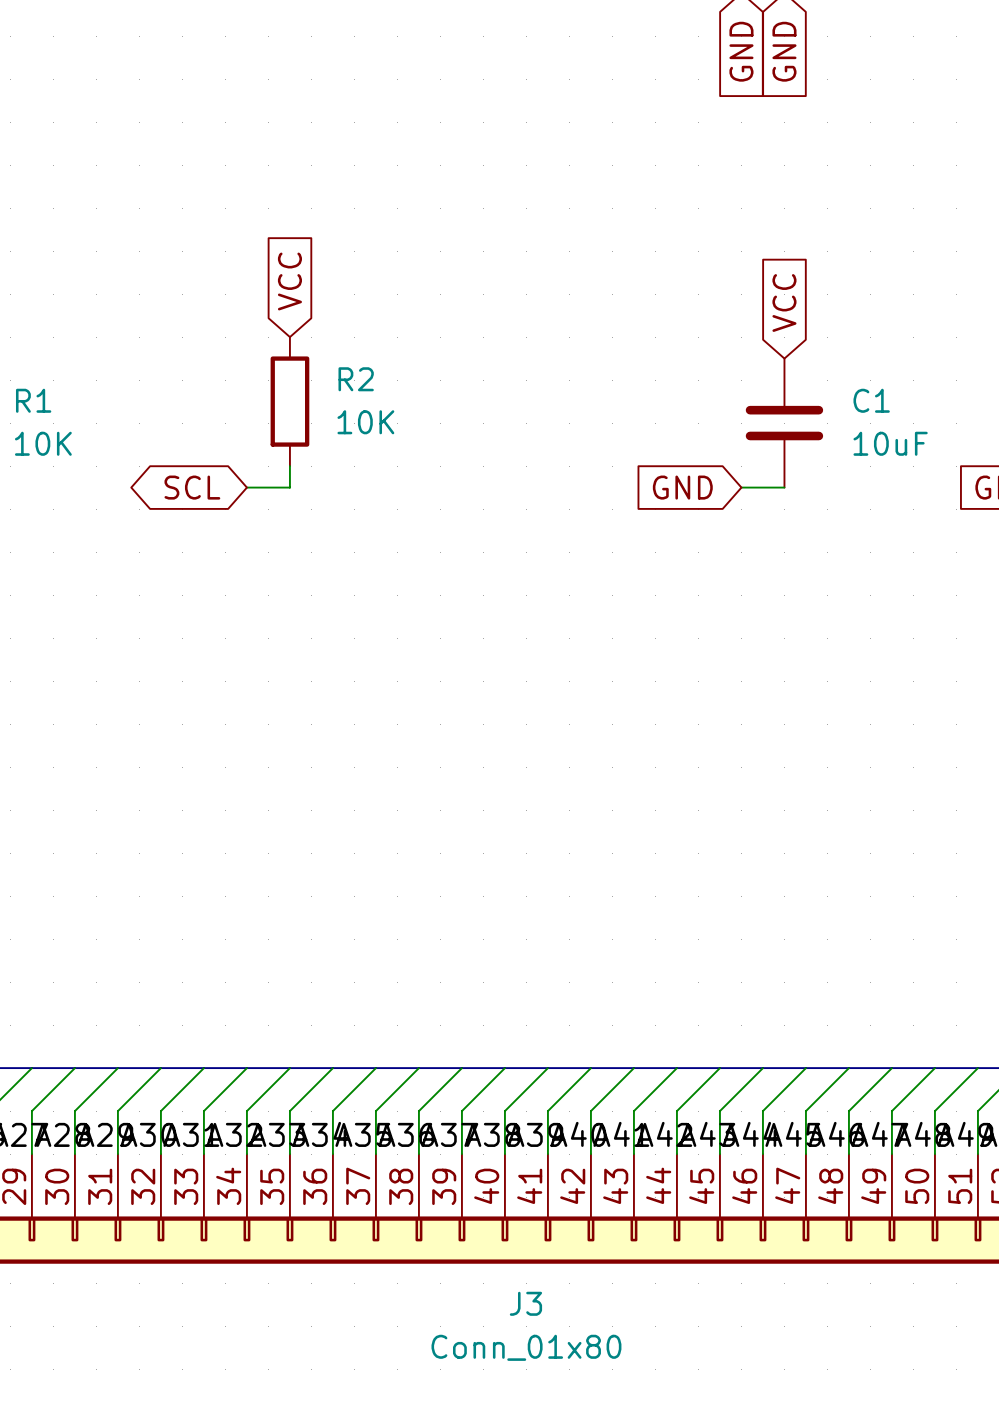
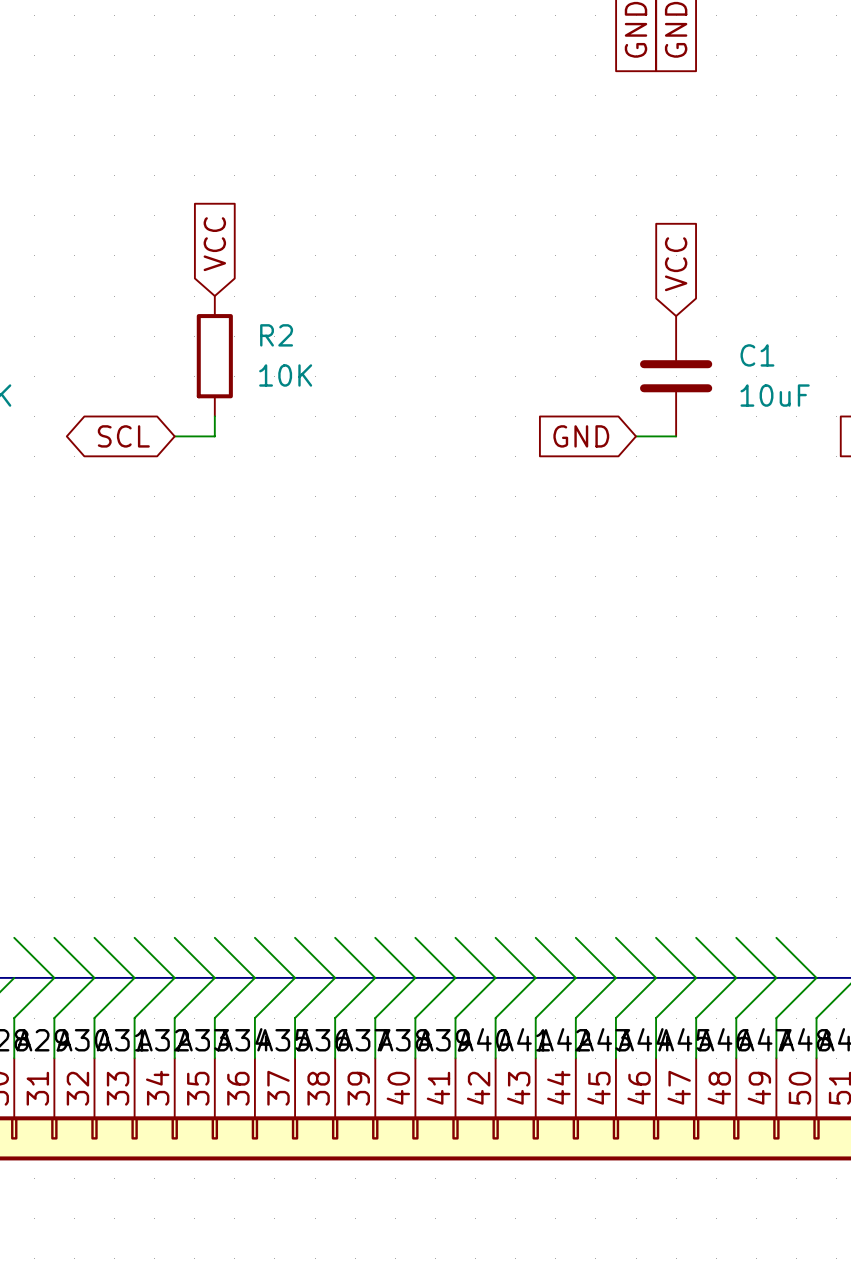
wire: none -> (14, 937) (54, 977)
wire: none -> (54, 937) (94, 977)
wire: none -> (94, 937) (134, 977)
wire: none -> (134, 937) (174, 977)
wire: none -> (174, 937) (214, 977)
wire: none -> (214, 937) (254, 977)
wire: none -> (254, 937) (295, 977)
wire: none -> (295, 937) (335, 977)
wire: none -> (335, 937) (375, 977)
wire: none -> (375, 937) (415, 977)
wire: none -> (415, 937) (455, 977)
wire: none -> (455, 937) (495, 977)
wire: none -> (495, 937) (535, 977)
wire: none -> (535, 937) (575, 977)
wire: none -> (575, 937) (615, 977)
wire: none -> (615, 937) (656, 977)
wire: none -> (656, 937) (696, 977)
wire: none -> (696, 937) (736, 977)
wire: none -> (736, 937) (776, 977)
wire: none -> (776, 937) (816, 977)
J3 name: J3 (525, 1303) -> none
J3 value: Conn_01x80 (526, 1347) -> none

